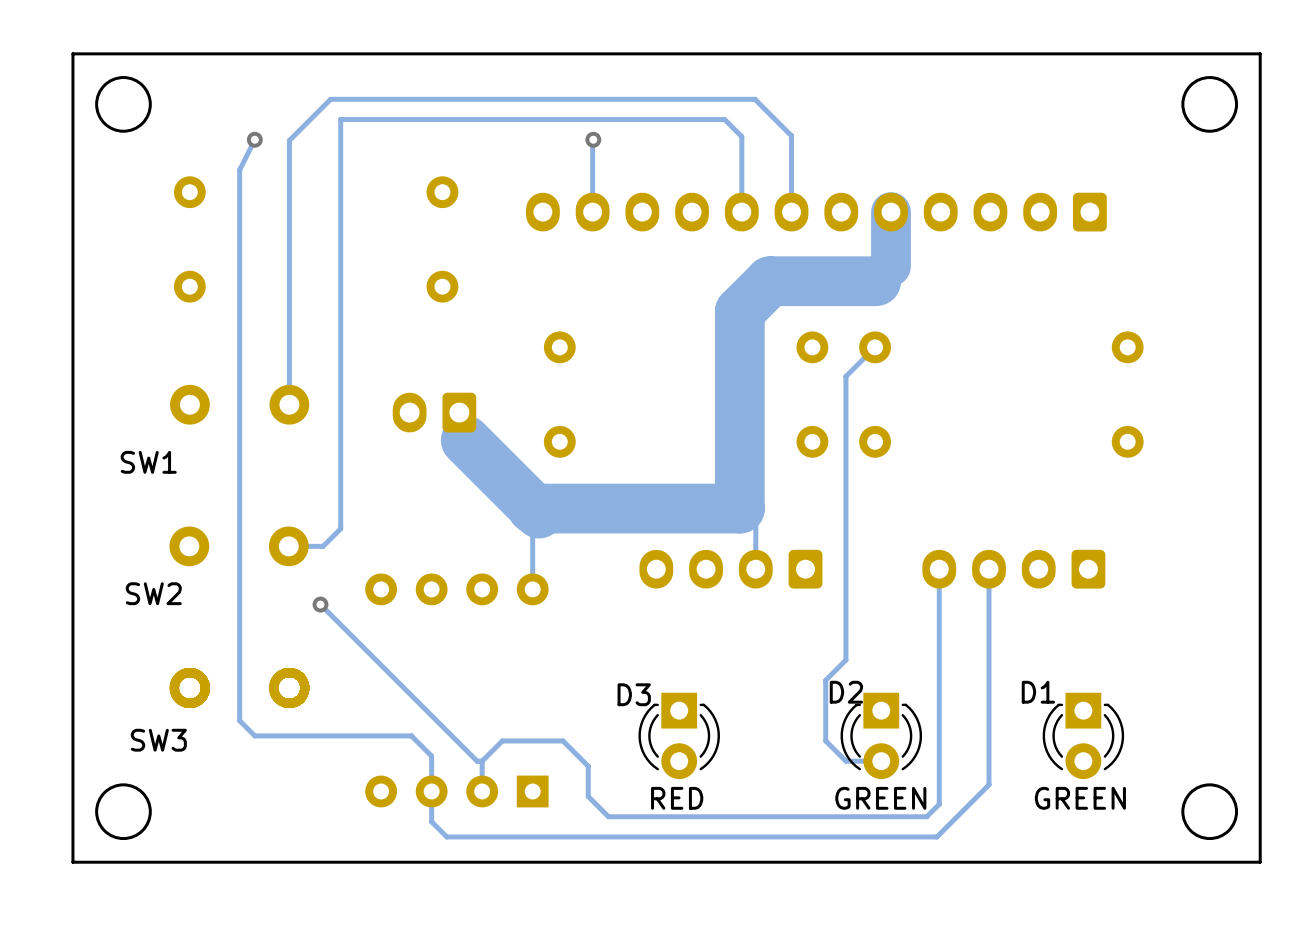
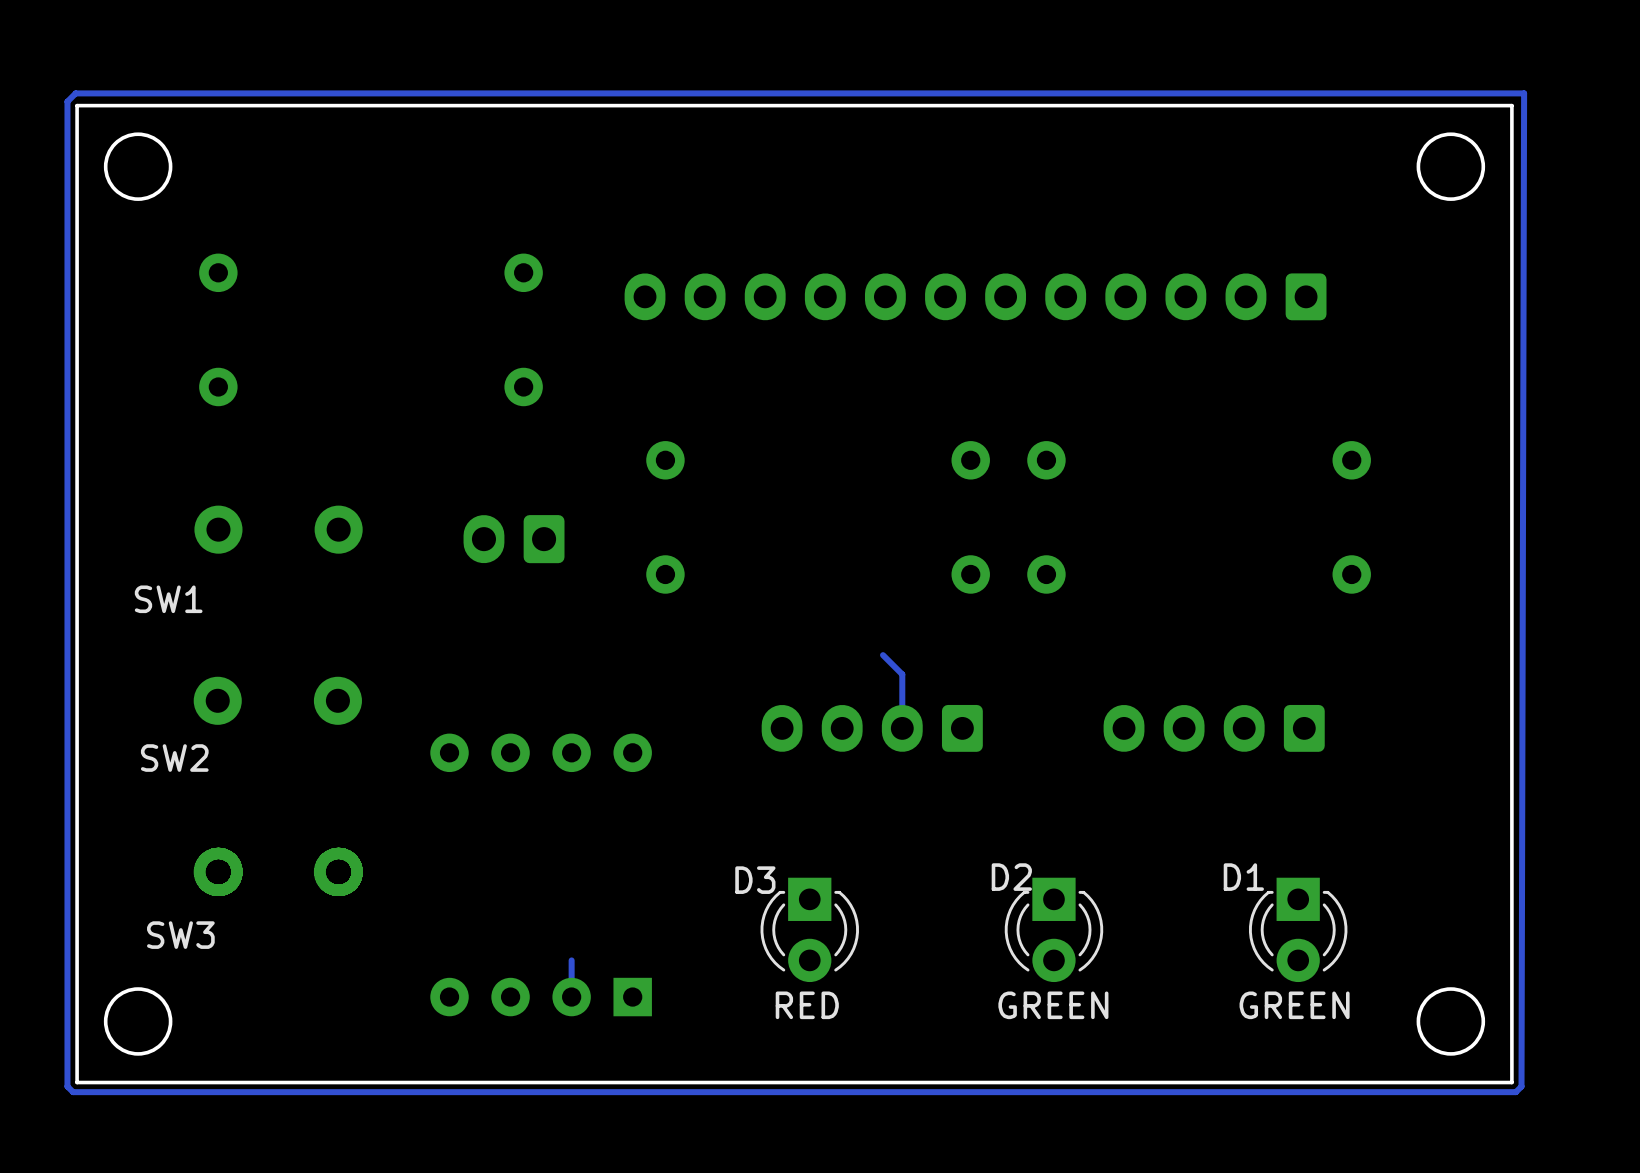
track: none -> (1524, 93) (1521, 1086) (1515, 1092) (73, 1092) (67, 1086) (67, 101) (75, 93) (1524, 93)
track: (254, 139) (239, 170) (239, 720) (254, 735) (411, 735) (431, 756) (431, 821) (446, 836) (936, 836) (988, 784) (988, 569) -> none
via: (254, 139) -> none
track: (593, 139) (592, 212) -> none
via: (593, 139) -> none
track: (741, 212) (741, 136) (724, 119) (340, 119) (340, 528) (323, 546) (288, 546) -> none
track: (791, 212) (791, 135) (754, 99) (330, 99) (289, 140) (289, 404) -> none
track: (890, 212) (890, 266) (876, 281) (770, 281) (739, 311) (739, 508) (532, 508) -> none
track: (875, 347) (845, 376) (845, 660) (825, 680) (825, 740) (845, 761) (881, 761) -> none
track: (465, 440) (539, 513) -> none
track: (532, 513) (532, 589) -> none
track: (939, 569) (939, 804) (926, 816) (608, 816) (588, 796) (588, 766) (563, 740) (502, 740) (482, 761) (477, 761) (320, 604) -> none
via: (320, 604) -> none

